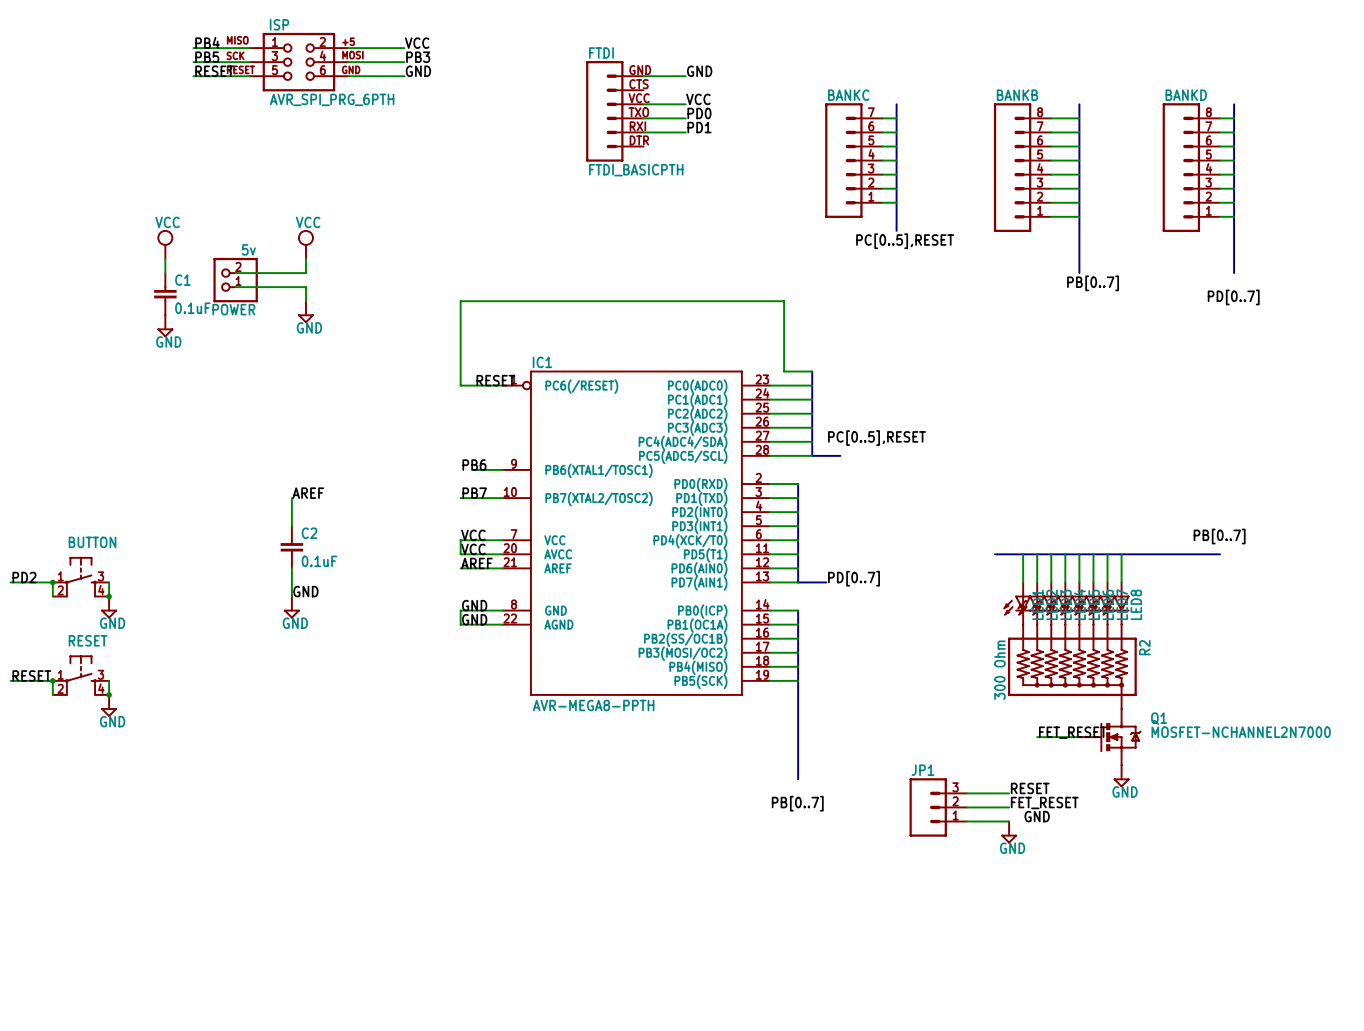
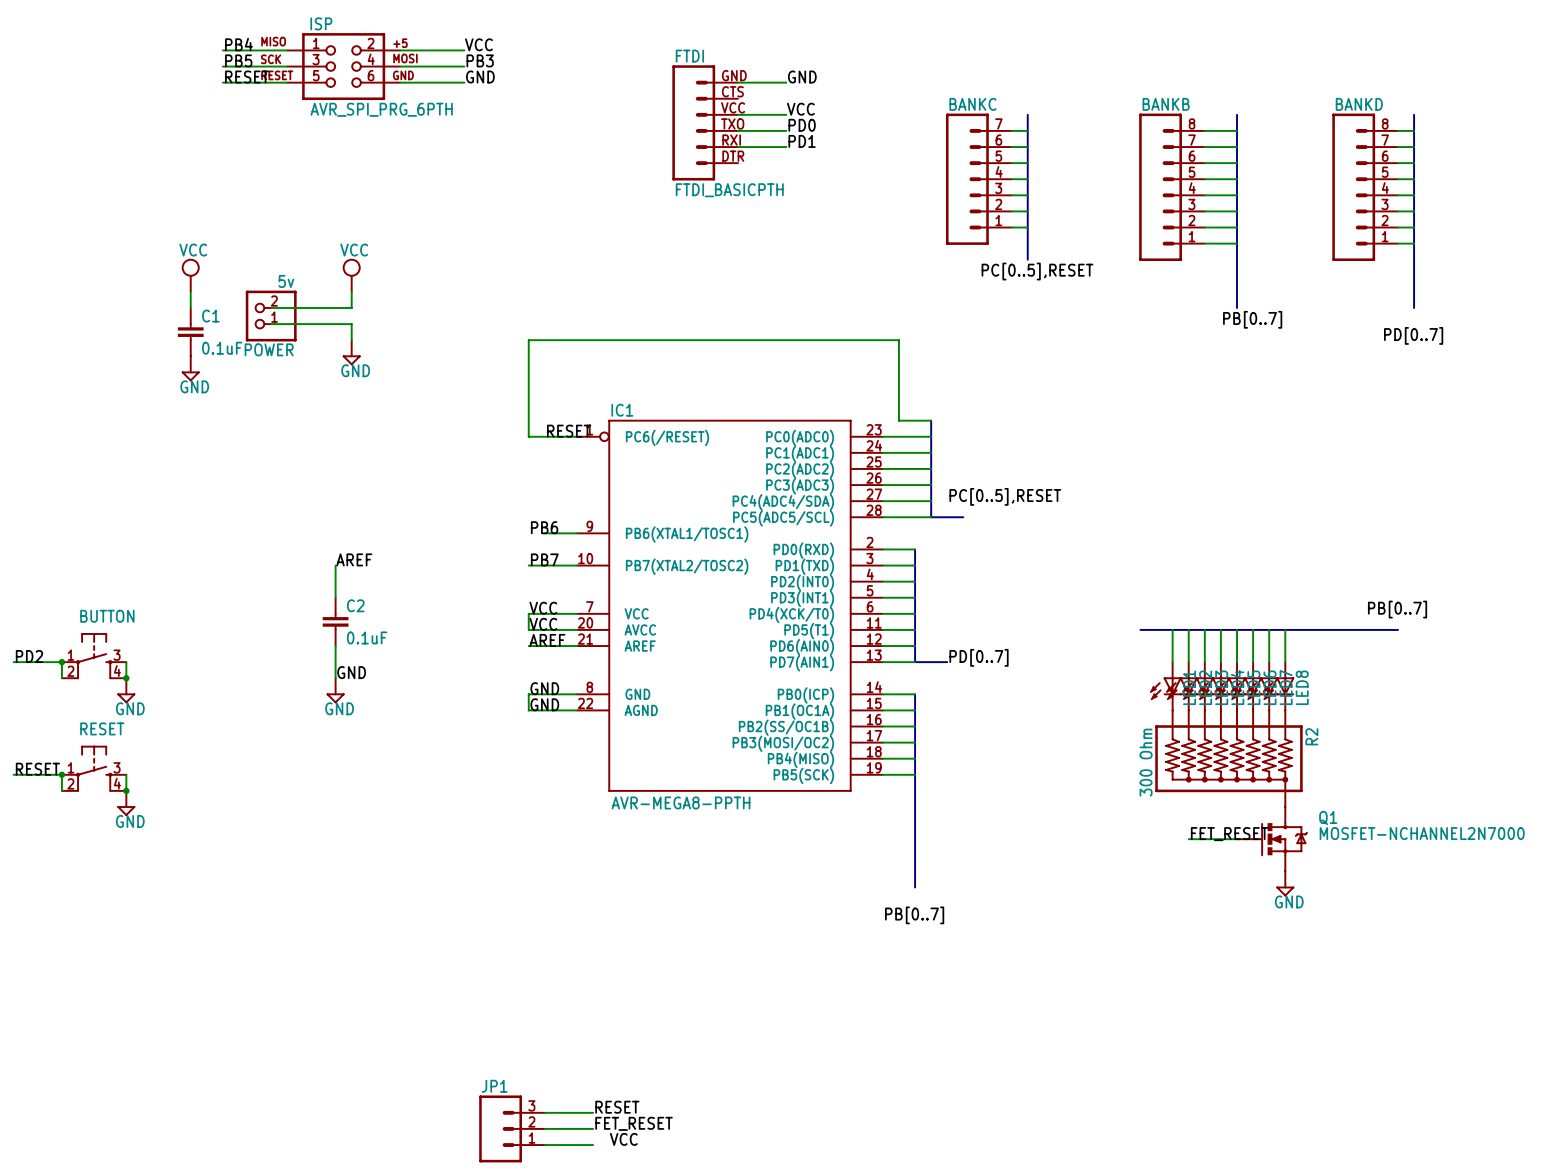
label: RESET (1030, 788) -> none
wire: (966, 793) (1009, 793) -> none
label: FET_RESET (1044, 802) -> none
JP1 position: (938, 807) -> (512, 1128)
wire: (966, 807) (1009, 807) -> none
label: GND (1037, 816) -> none
wire: (966, 821) (1009, 821) -> none
power symbol: GND (1009, 832) -> none
label: none -> RESET (617, 1107)
wire: none -> (544, 1112) (593, 1112)
label: none -> FET_RESET (634, 1123)
wire: none -> (544, 1128) (593, 1128)
label: none -> VCC (623, 1139)
wire: none -> (544, 1145) (593, 1145)

